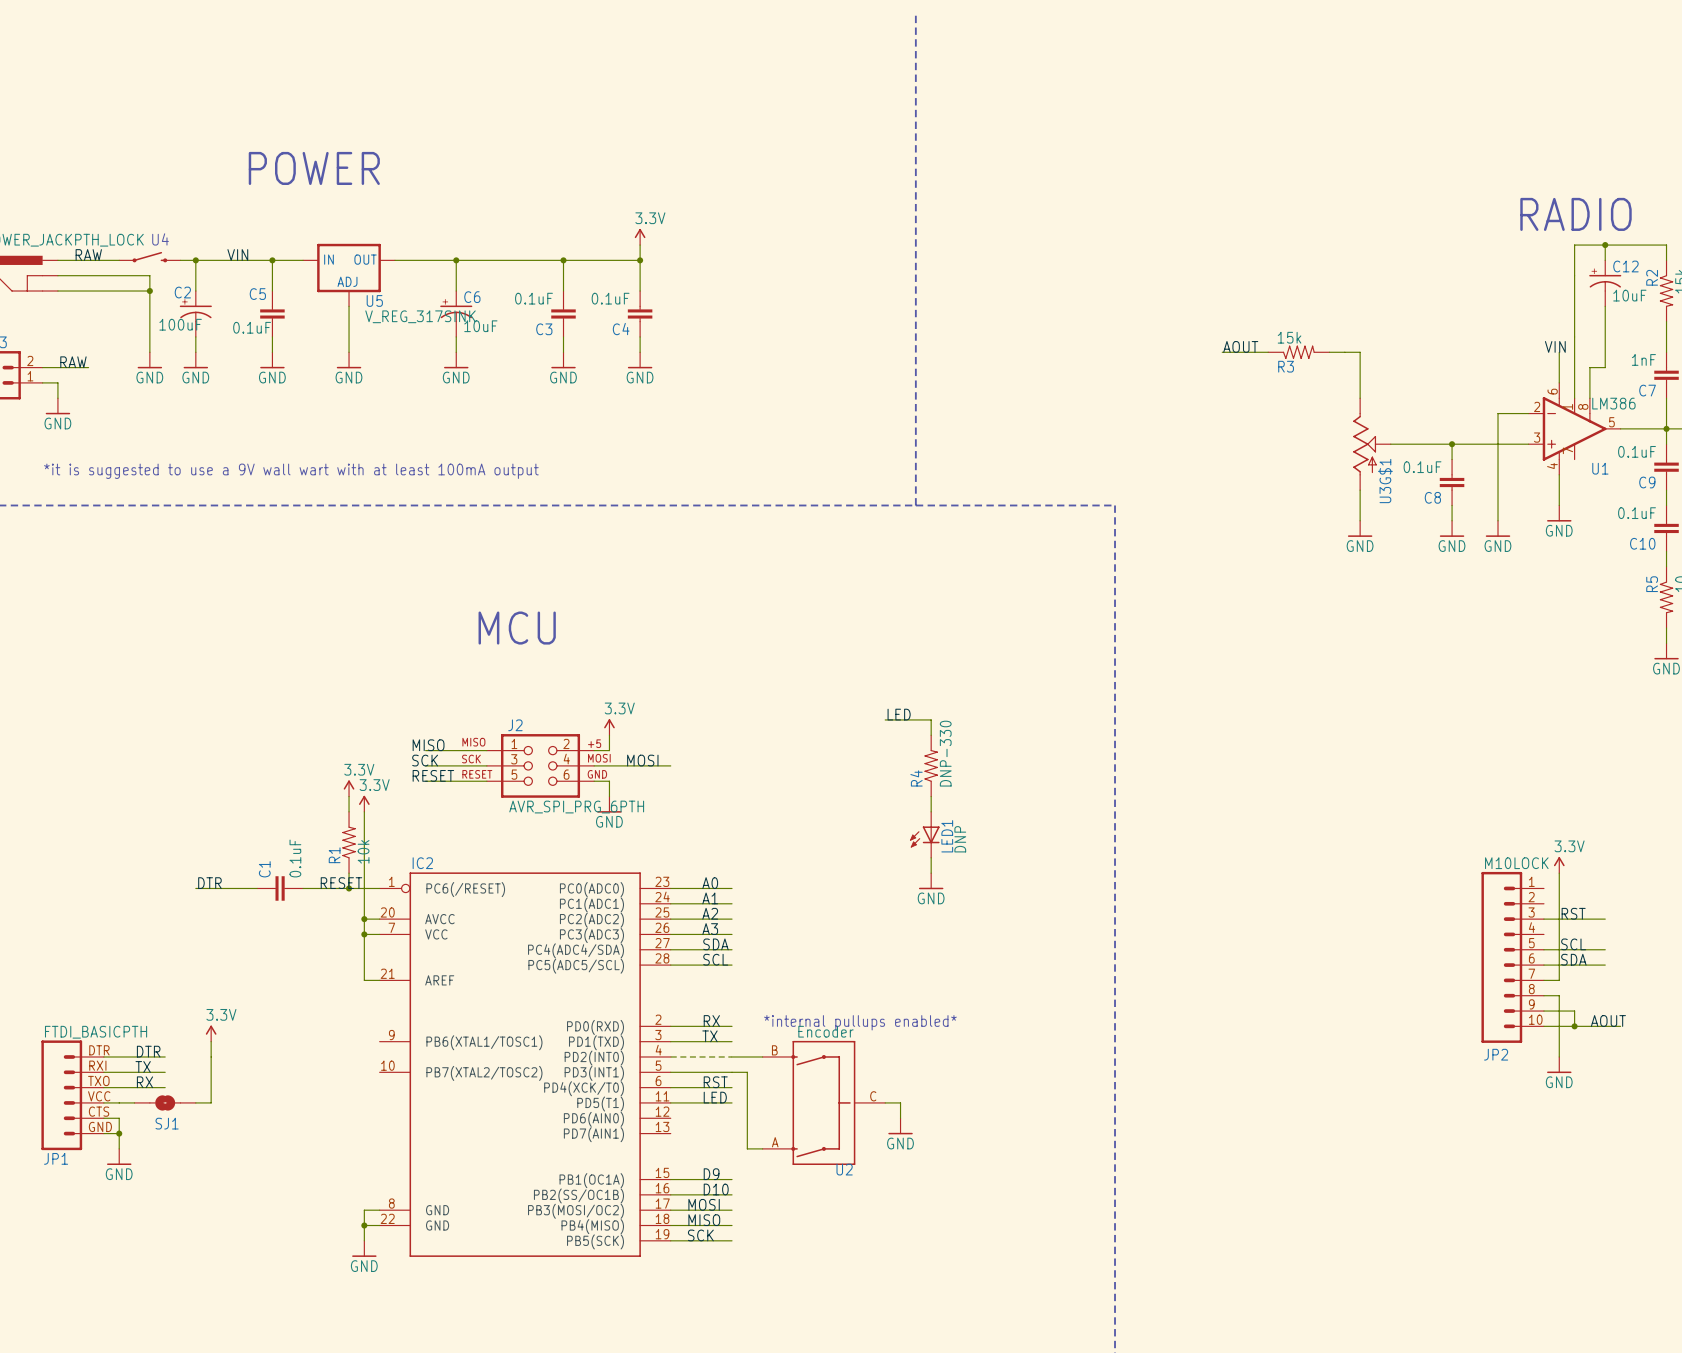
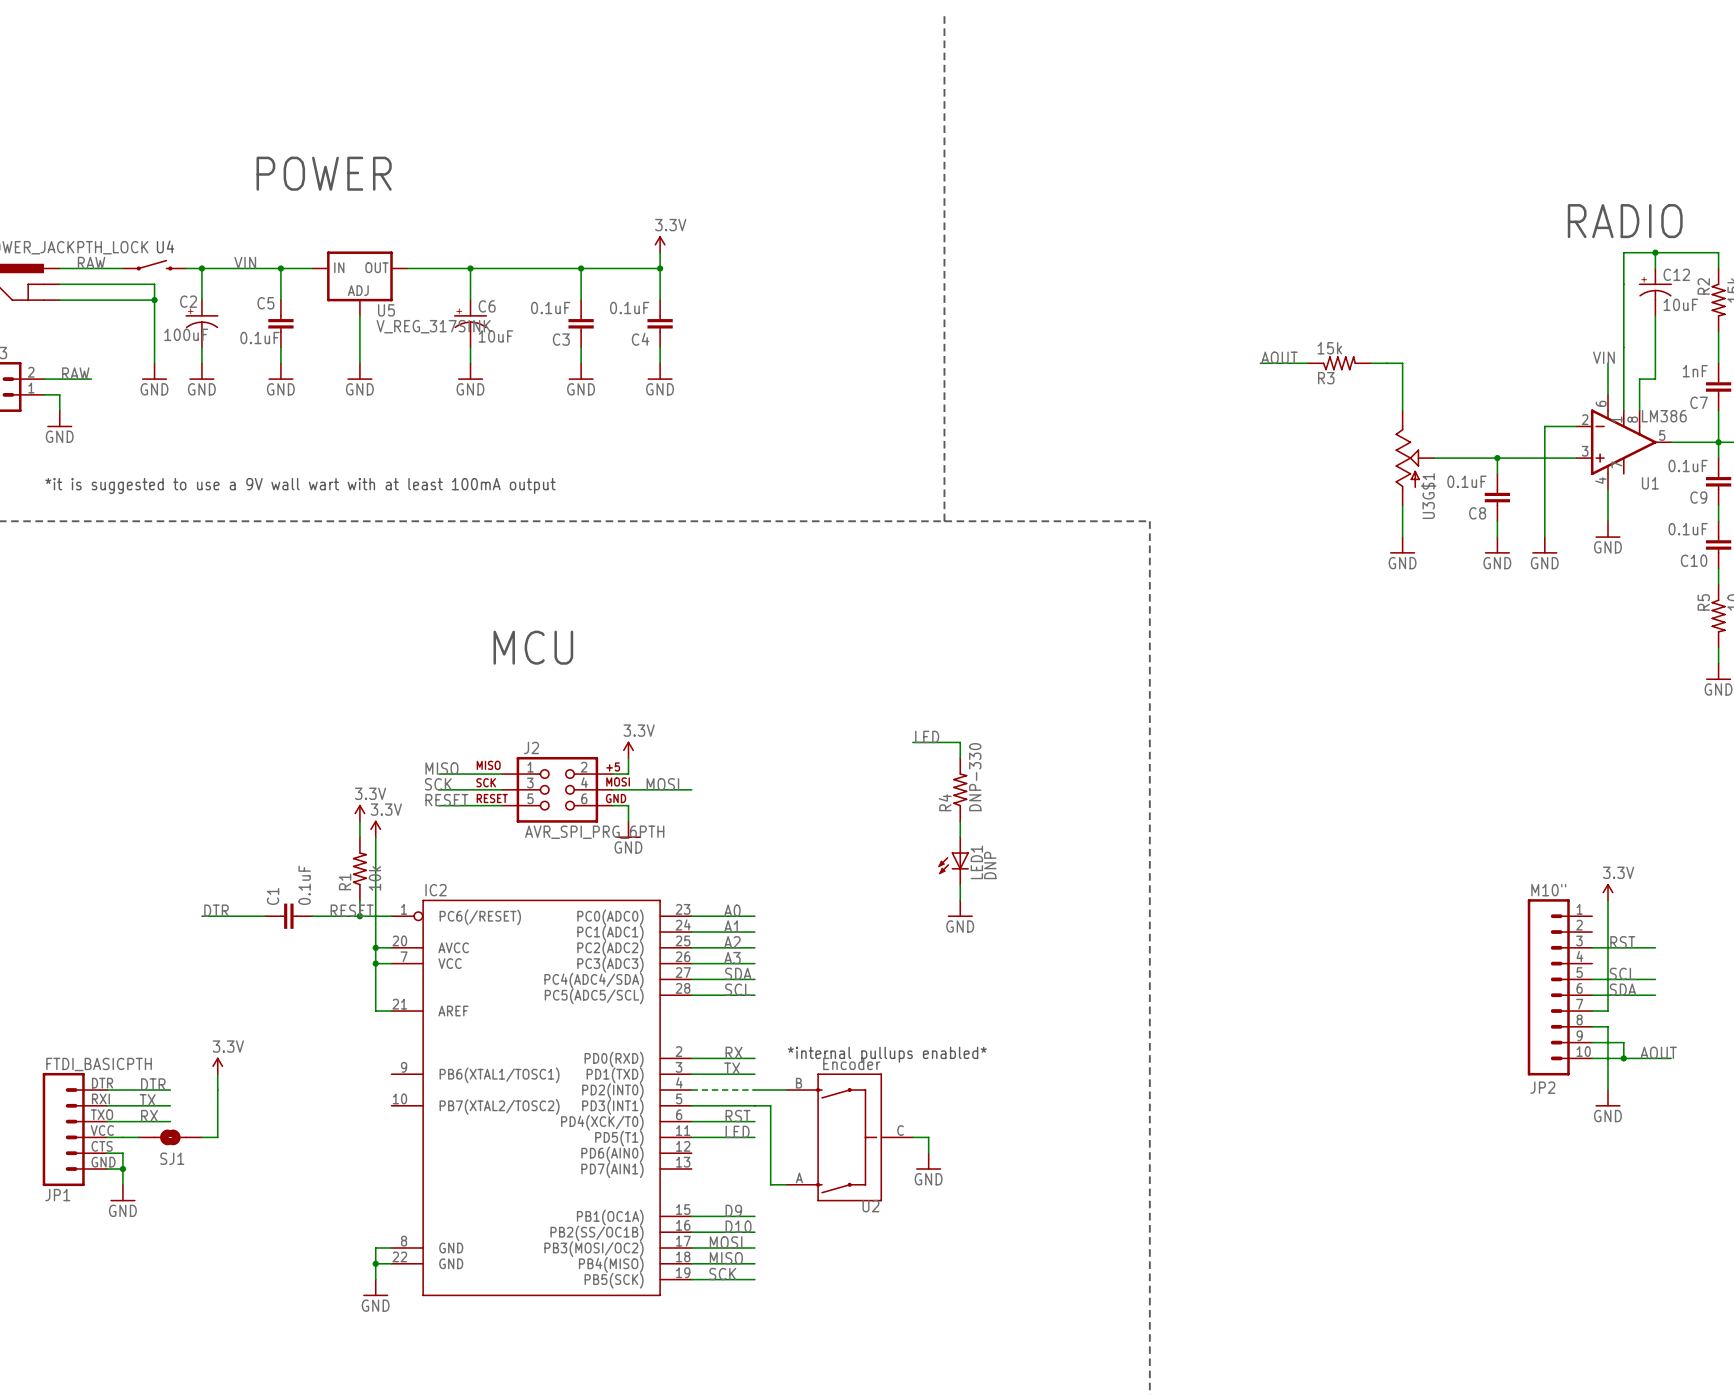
JP2 value: M10LOCK (1516, 863) -> M10" (1548, 890)

